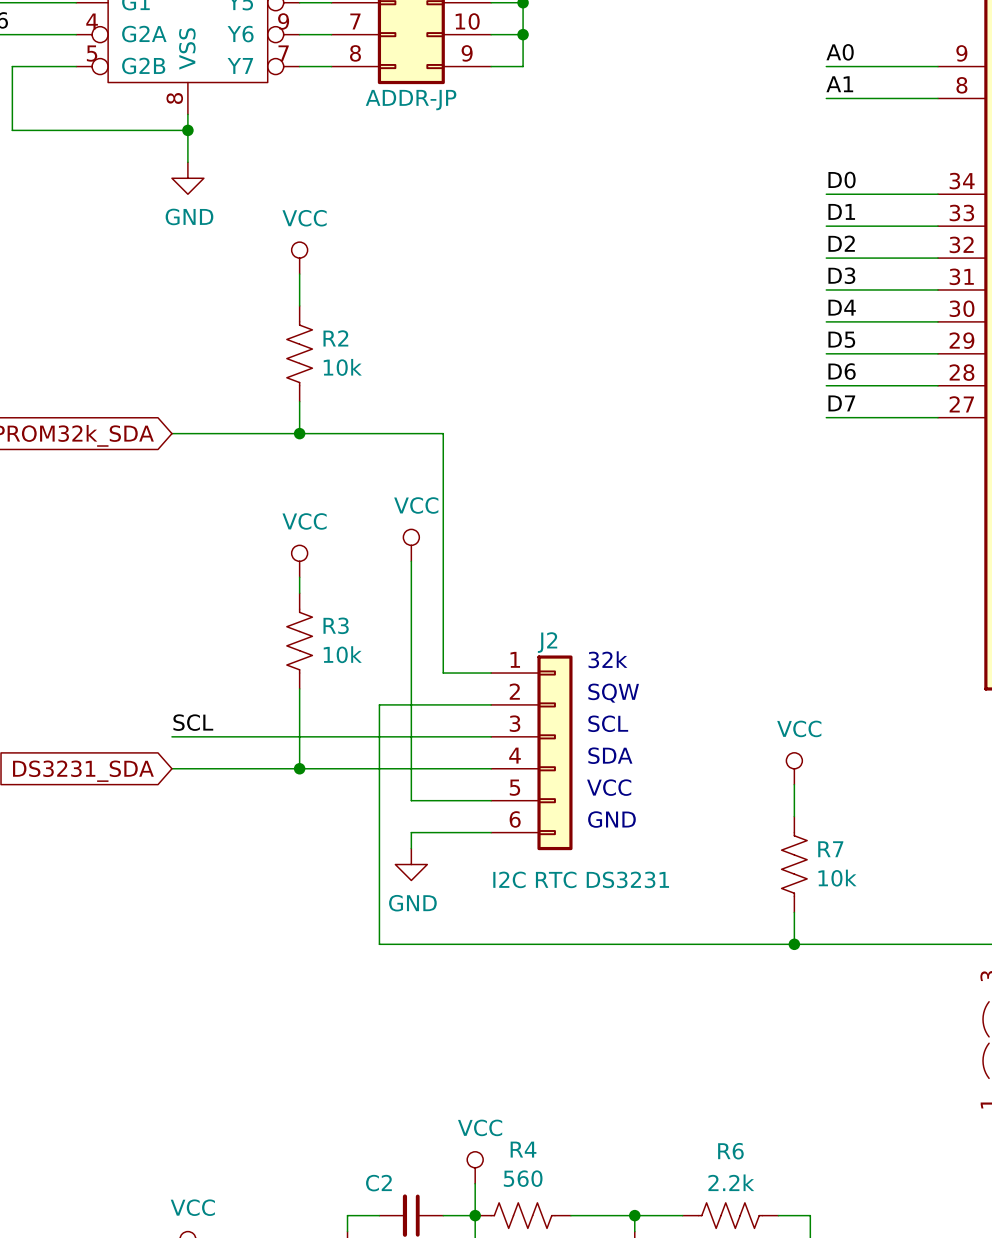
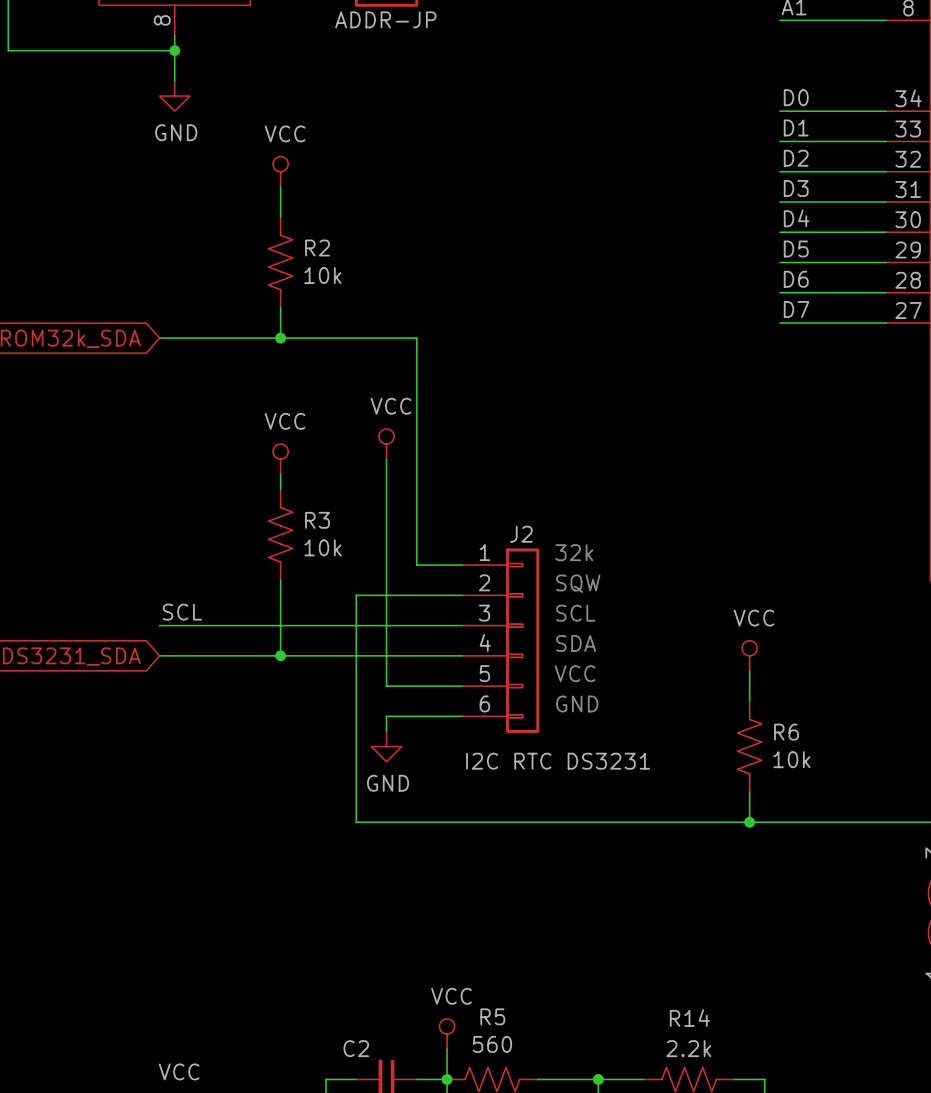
R7 name: R7 (830, 849) -> R6 (786, 732)
R4 name: R4 (523, 1149) -> R5 (492, 1016)
R6 name: R6 (730, 1151) -> R14 (689, 1018)

